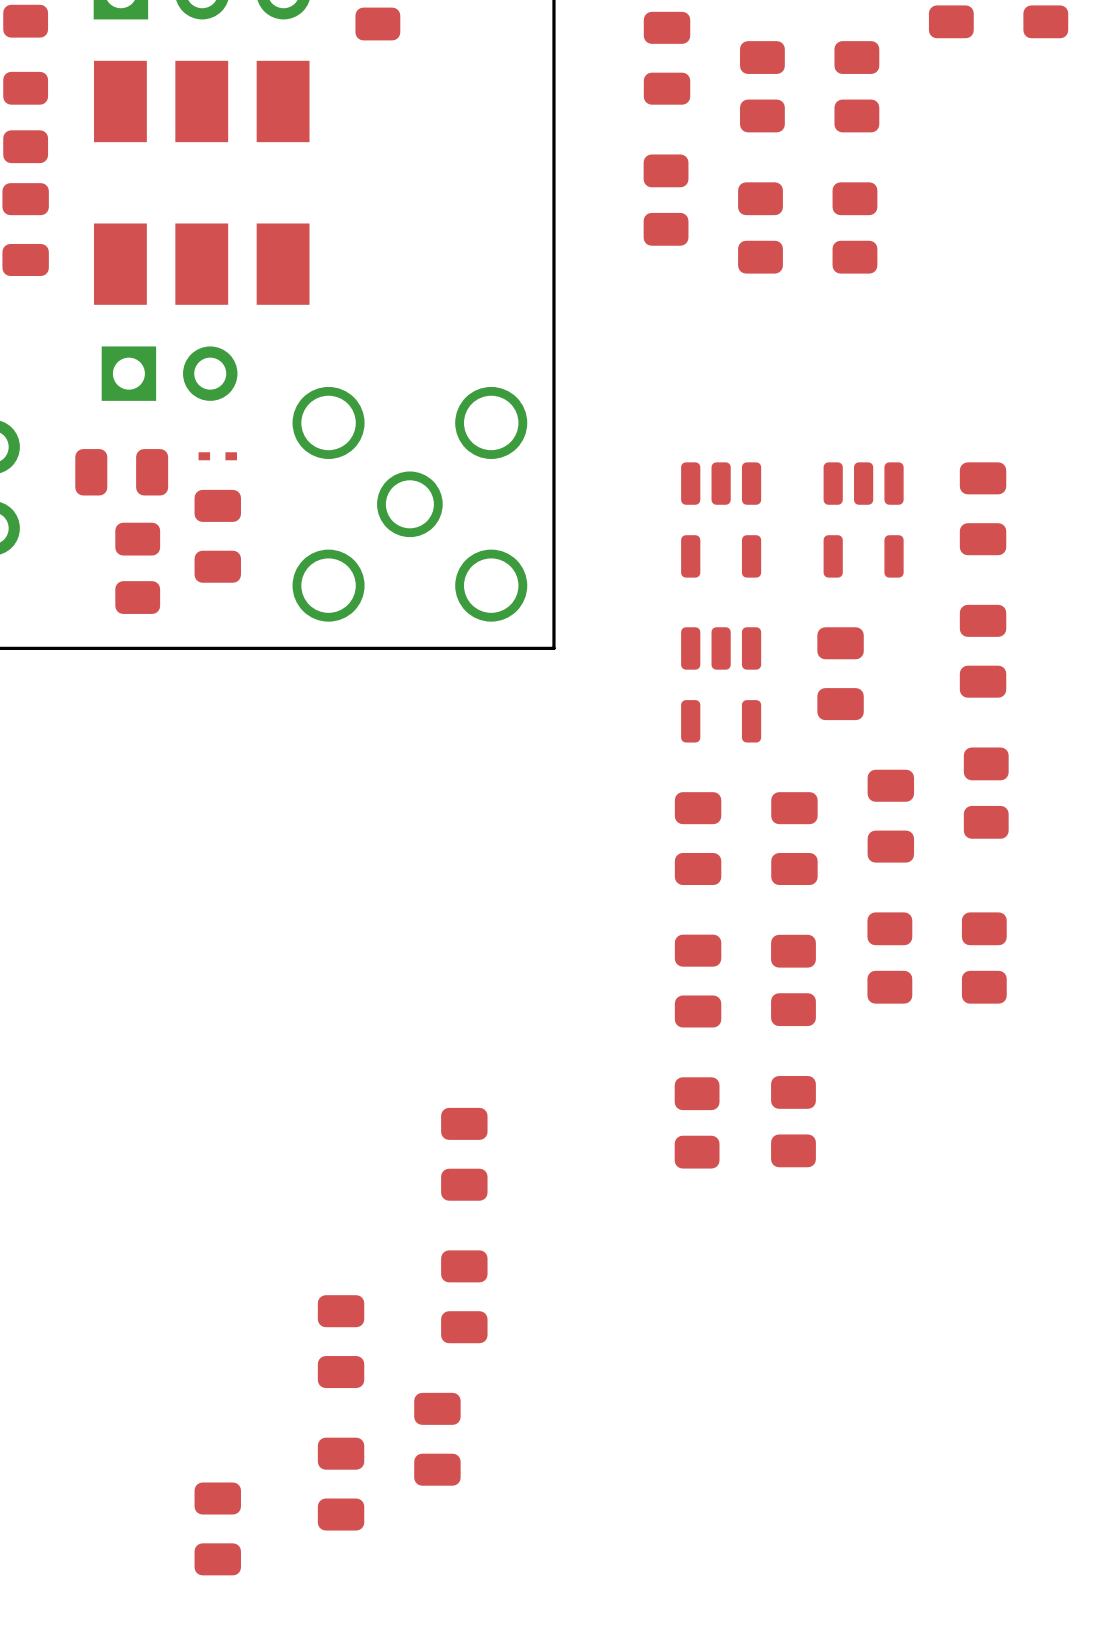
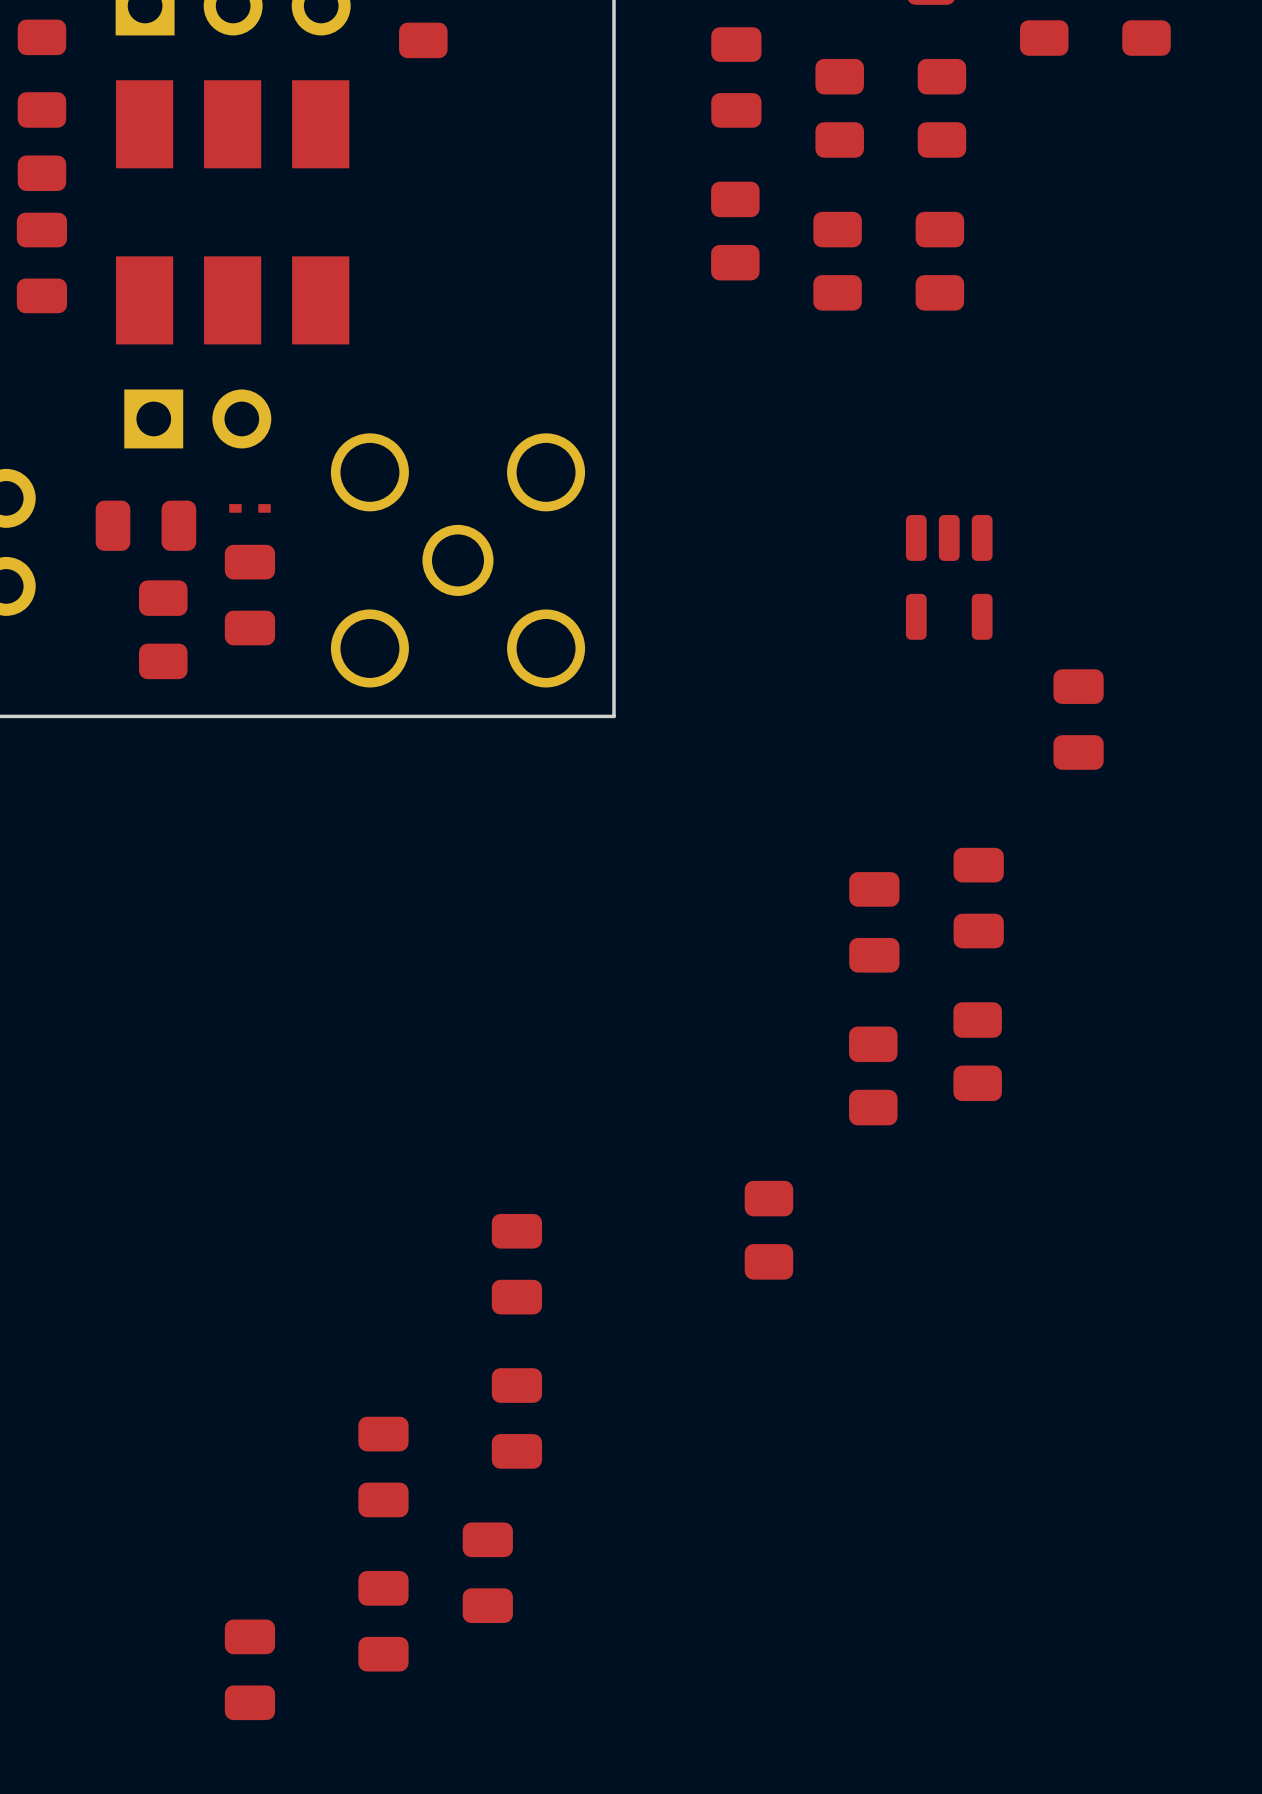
part: (983, 508) -> none
part: (721, 519) -> none
part: (840, 673) -> none
part: (721, 684) -> none
part: (986, 793) -> none
part: (698, 838) -> none
part: (984, 958) -> none
part: (698, 981) -> none
part: (793, 1121) -> none

